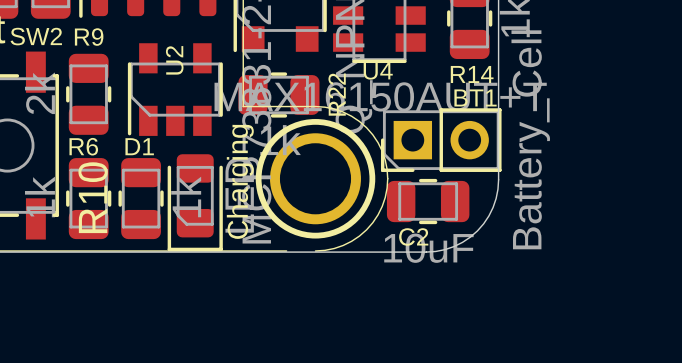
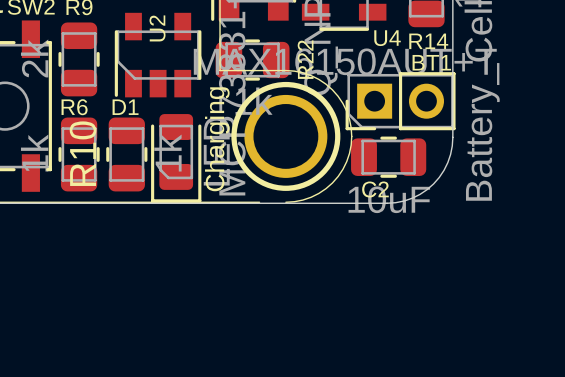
U4 name position: U4 (378, 71) -> U4 (387, 38)

